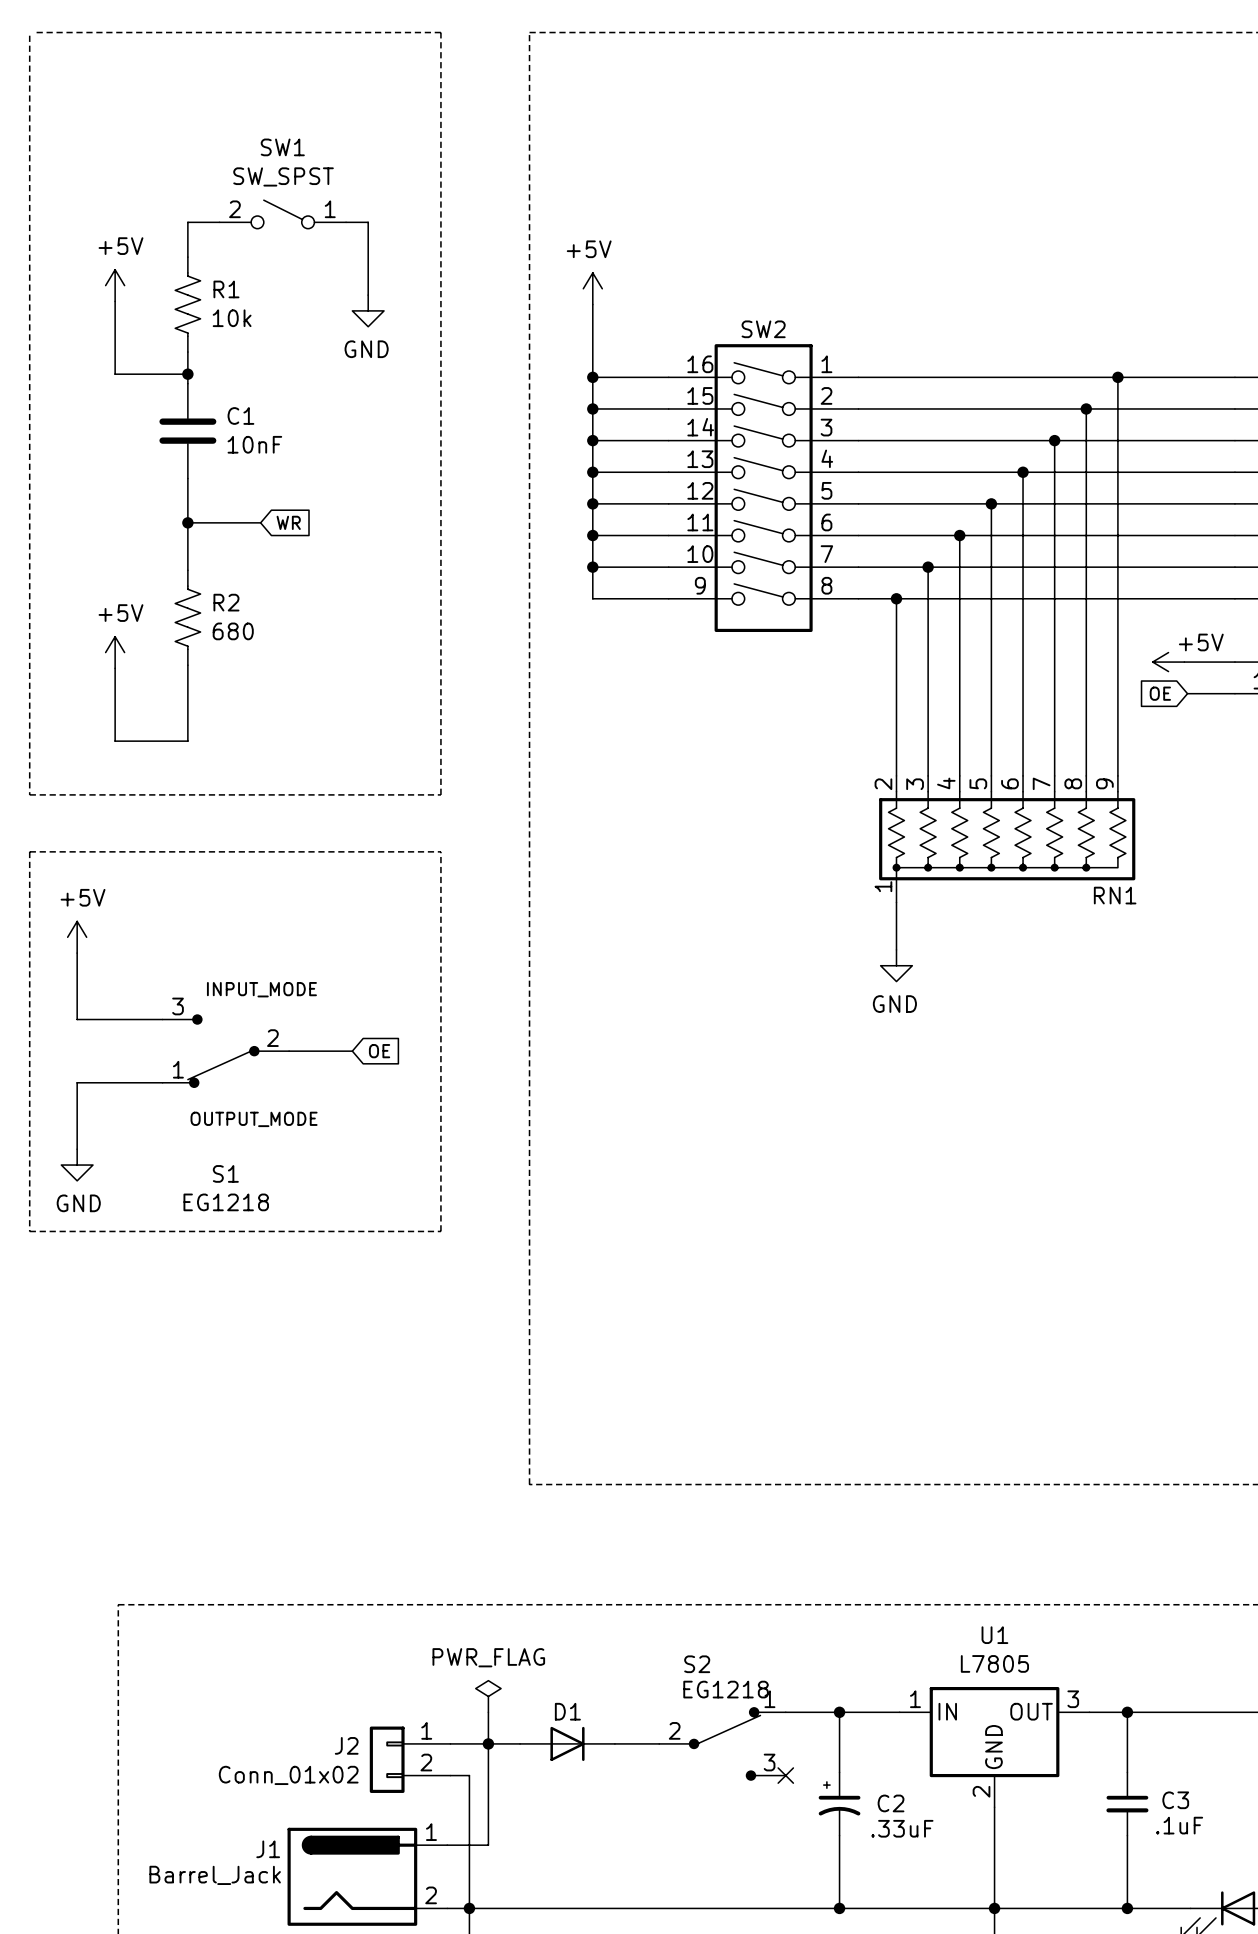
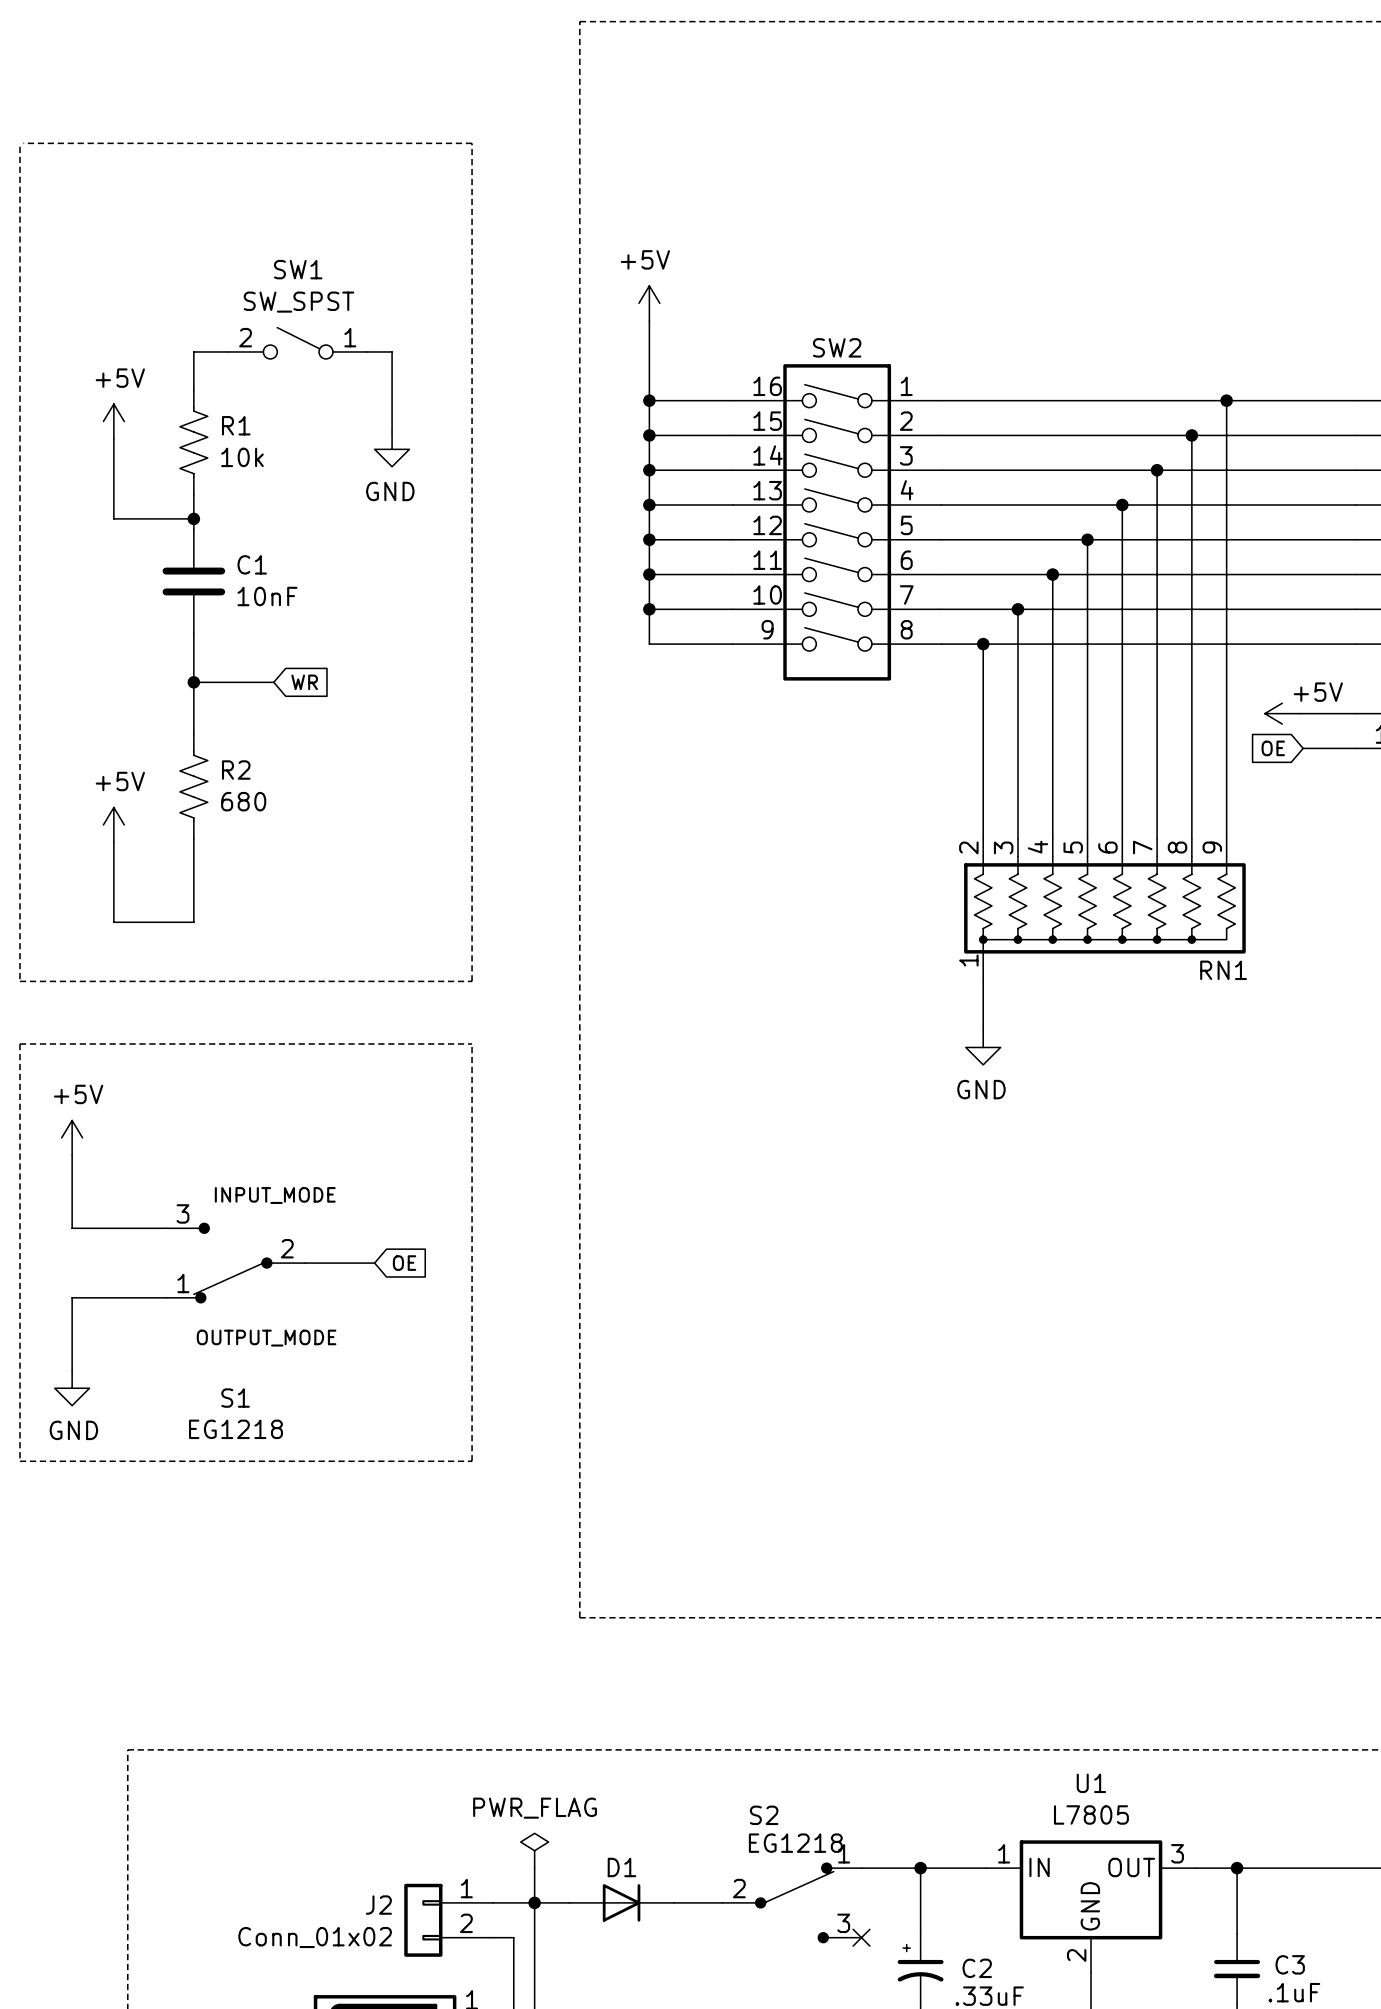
line: (32, 32) (440, 32) (440, 794) (29, 794) (29, 35) -> (23, 143) (472, 143) (472, 981) (19, 981) (19, 146)
SW1 position: (282, 214) -> (298, 343)
wire: (219, 222) (187, 222) (187, 257) -> (228, 351) (193, 351) (193, 390)
wire: (346, 222) (368, 222) (368, 295) -> (367, 351) (392, 351) (392, 431)
power symbol position: +5V (115, 285) -> +5V (113, 421)
wire: (115, 301) (115, 374) (187, 374) -> (113, 438) (113, 518) (193, 518)
R1 position: (187, 304) -> (193, 442)
power symbol position: GND (368, 310) -> GND (392, 449)
wire: (187, 352) (187, 383) -> (193, 494) (193, 529)
junction: (187, 374) -> none
C1 position: (187, 431) -> (193, 581)
wire: (187, 478) (187, 570) -> (193, 633) (193, 734)
wire: (187, 522) (260, 522) -> (193, 682) (273, 682)
junction position: (187, 522) -> (193, 518)
global label position: WR (288, 522) -> WR (304, 682)
R2 position: (187, 617) -> (193, 786)
junction: none -> (193, 682)
power symbol: +5V (115, 652) -> none
wire: (187, 665) (187, 741) (115, 741) (115, 668) -> (193, 838) (193, 922) (113, 922) (113, 842)
power symbol: none -> +5V (113, 824)
line: (29, 851) (29, 1231) (440, 1231) (440, 851) (29, 851) -> (19, 1043) (19, 1461) (472, 1461) (472, 1043) (19, 1043)
power symbol: +5V (77, 937) -> none
wire: (77, 953) (77, 1019) (162, 1019) -> (72, 1155) (72, 1228) (166, 1228)
label position: INPUT_MODE (261, 989) -> INPUT_MODE (275, 1195)
power symbol: none -> +5V (72, 1137)
S1 position: (225, 1051) -> (235, 1263)
wire: (289, 1051) (352, 1051) -> (305, 1263) (374, 1263)
global label position: OE (379, 1051) -> OE (404, 1263)
wire: (162, 1082) (77, 1082) (77, 1149) -> (166, 1297) (72, 1297) (72, 1370)
label position: OUTPUT_MODE (254, 1119) -> OUTPUT_MODE (266, 1338)
power symbol position: GND (77, 1165) -> GND (72, 1388)

